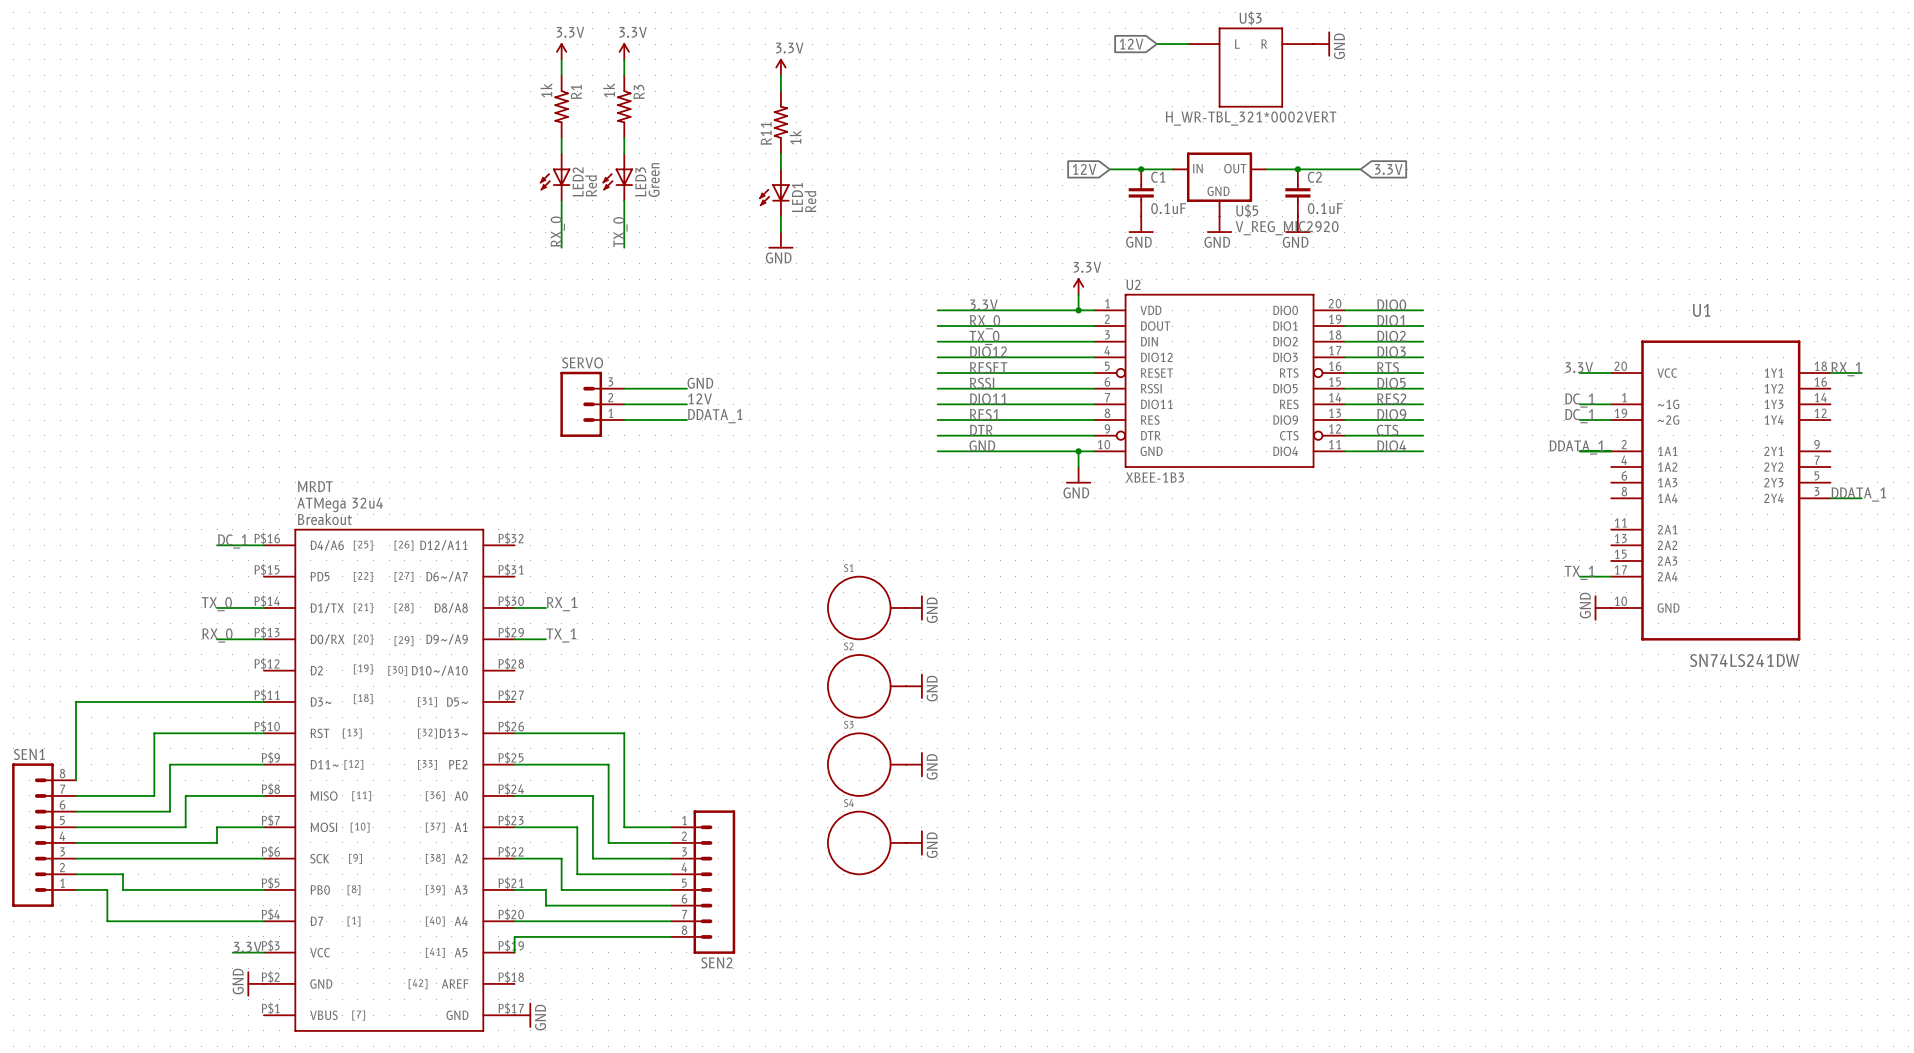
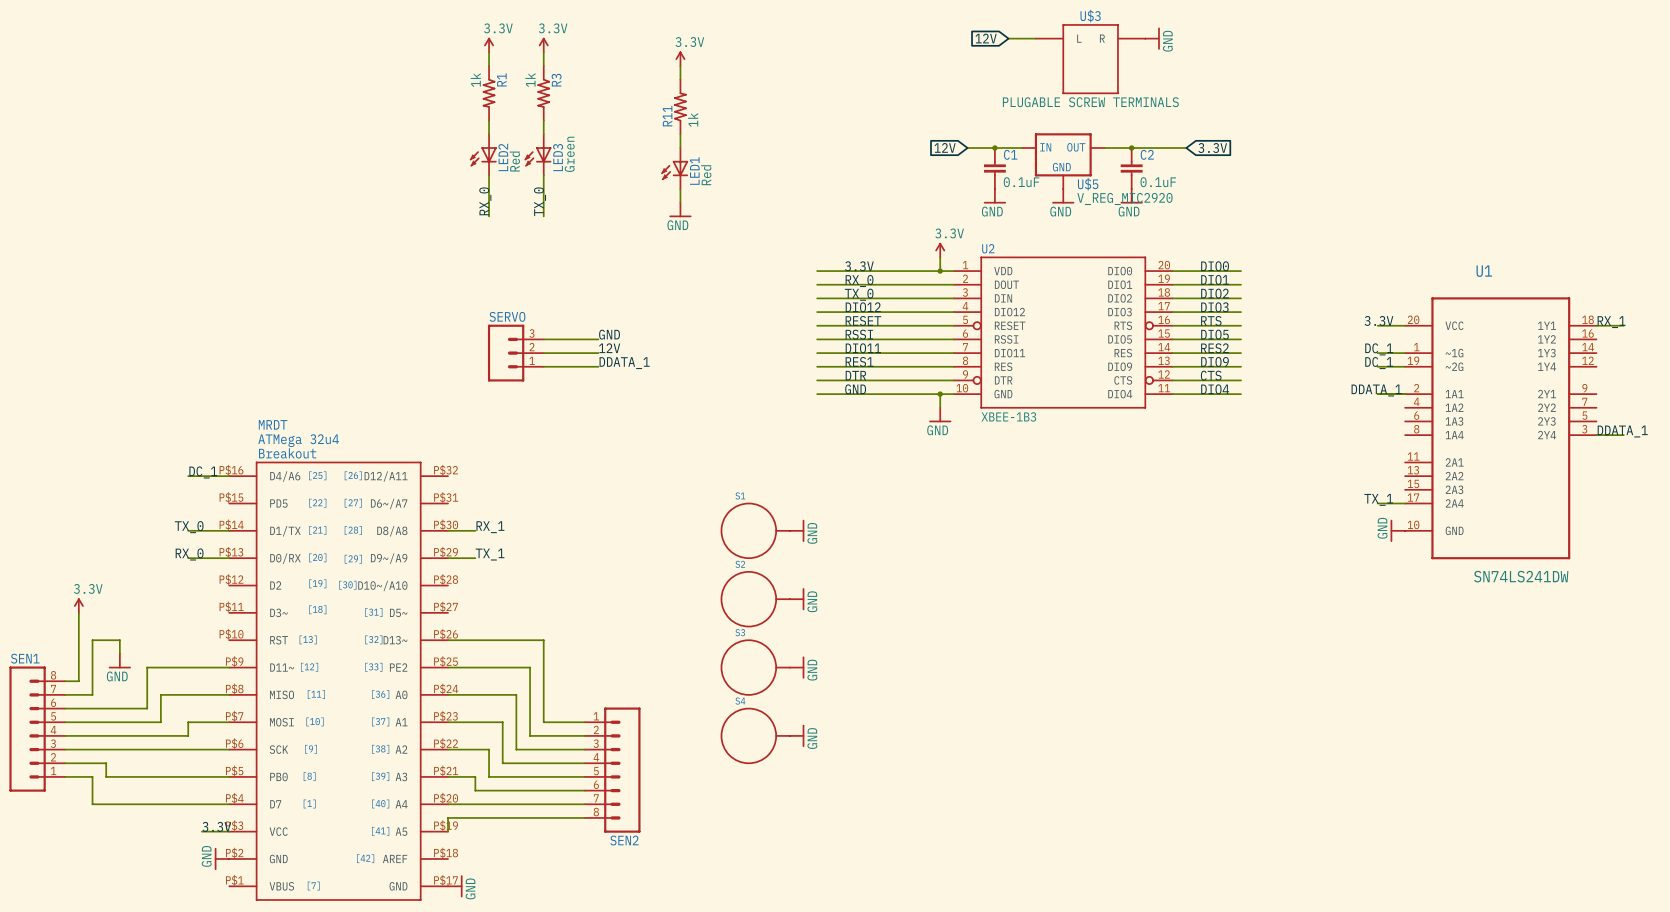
U$3 value: H_WR-TBL_321*0002VERT (1251, 118) -> PLUGABLE SCREW TERMINALS (1090, 102)
power symbol: none -> 3.3V (78, 605)
wire: (263, 701) (76, 701) (76, 780) -> (78, 612) (78, 681) (65, 681)
wire: (263, 733) (154, 733) (154, 795) (107, 795) -> (119, 653) (119, 640) (92, 640) (92, 694)
power symbol: none -> GND (119, 661)

